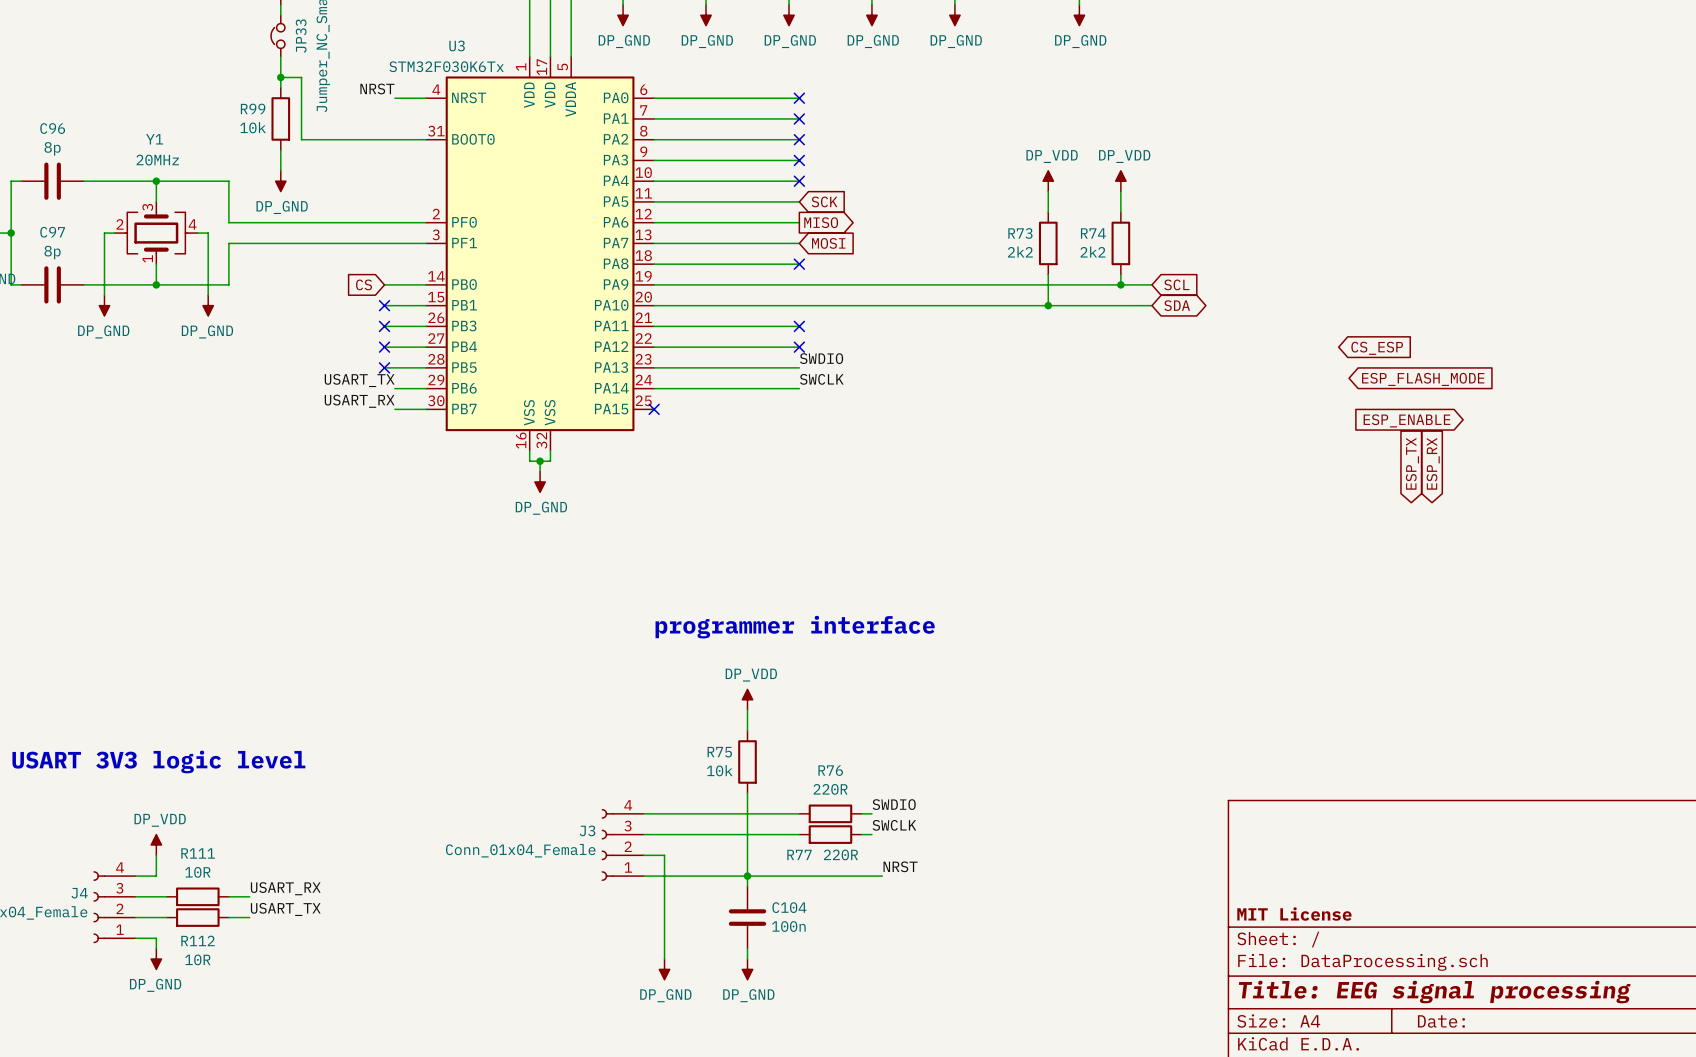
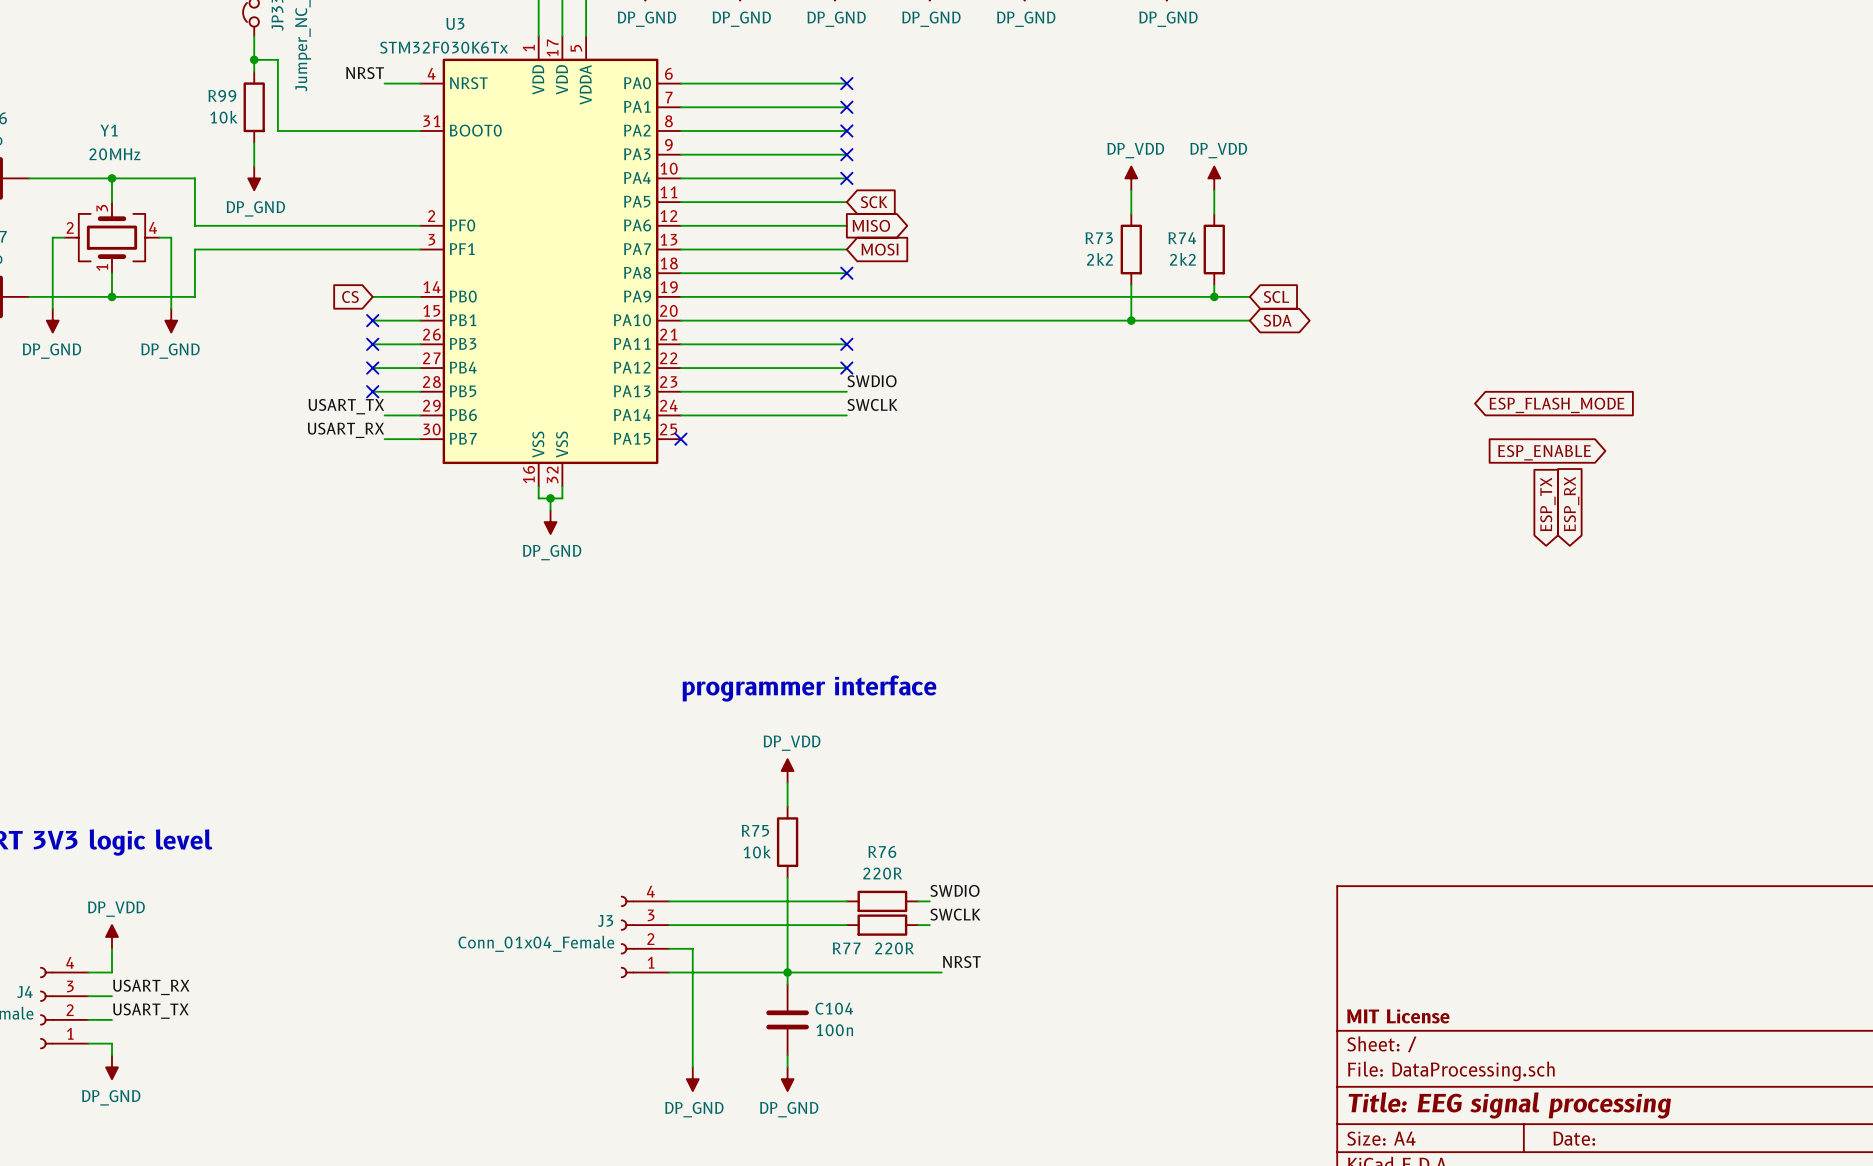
global label: CS_ESP (1377, 348) -> none
label position: USART_RX (285, 888) -> USART_RX (151, 987)
wire: (156, 896) (166, 896) -> none
R111: 10R (197, 896) -> none
wire: (228, 896) (249, 896) -> none
label position: USART_TX (285, 909) -> USART_TX (150, 1011)
wire: (156, 917) (166, 917) -> none
R112: 10R (197, 917) -> none
wire: (228, 917) (249, 917) -> none

